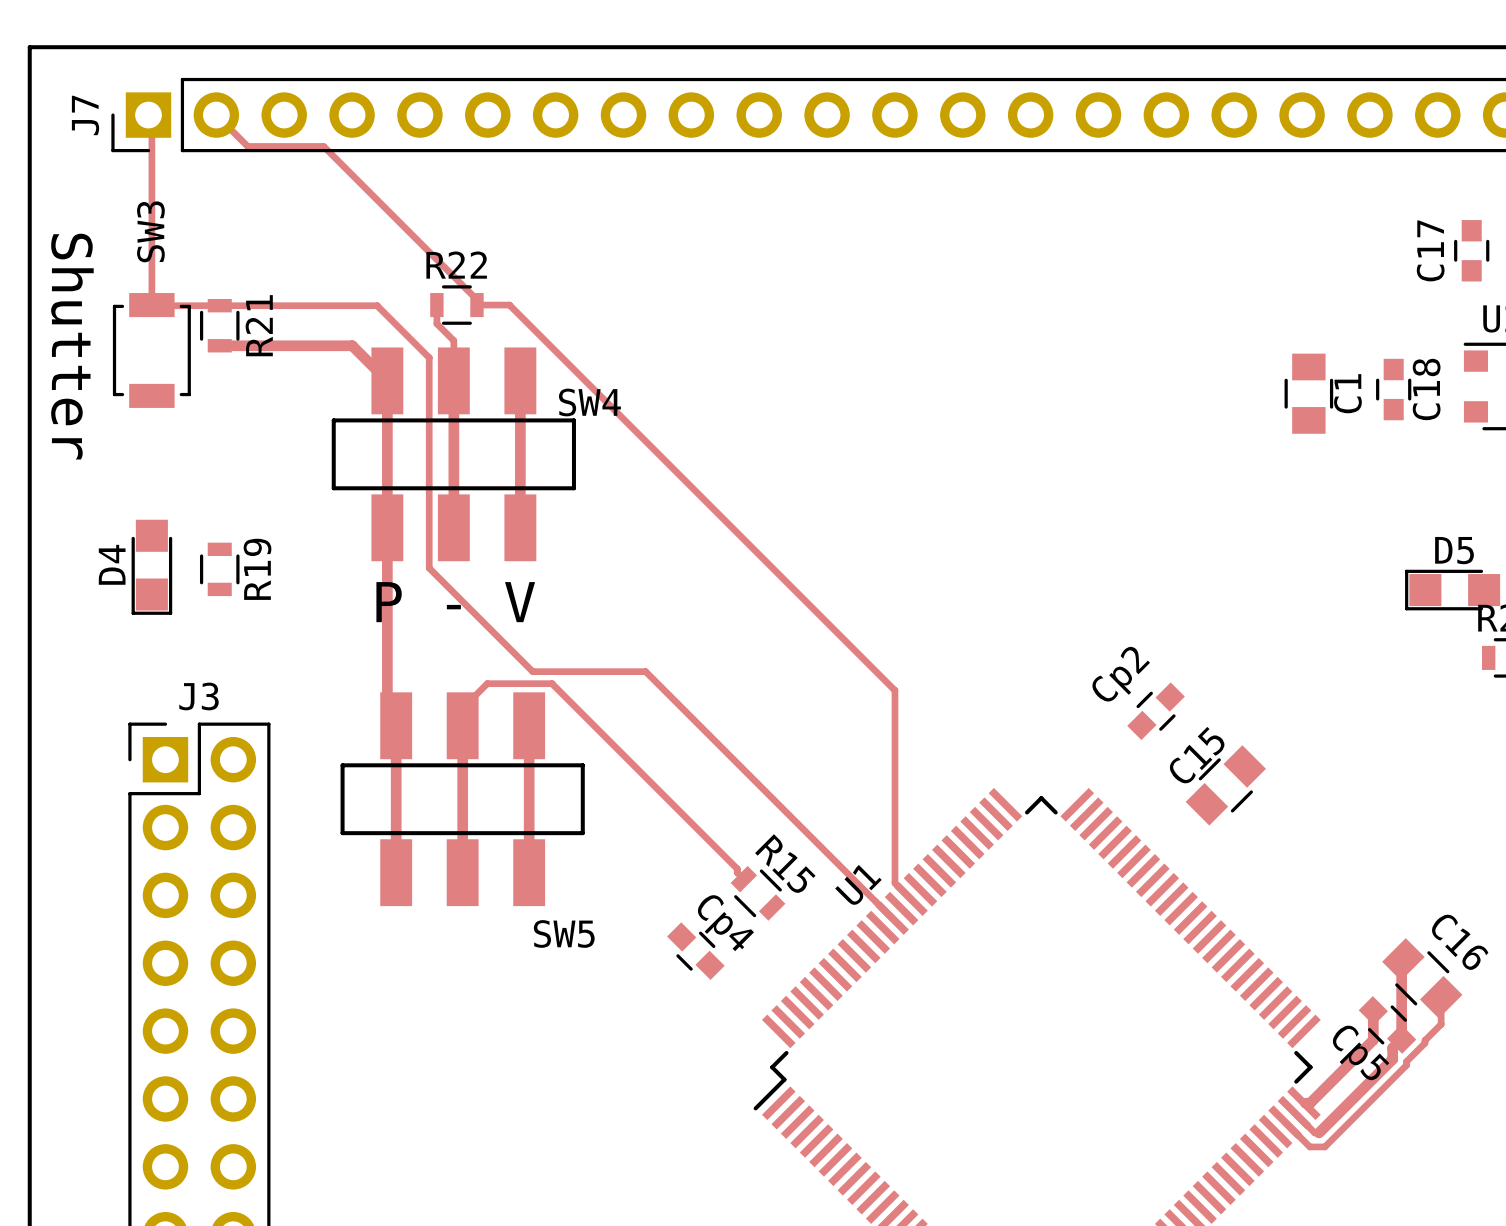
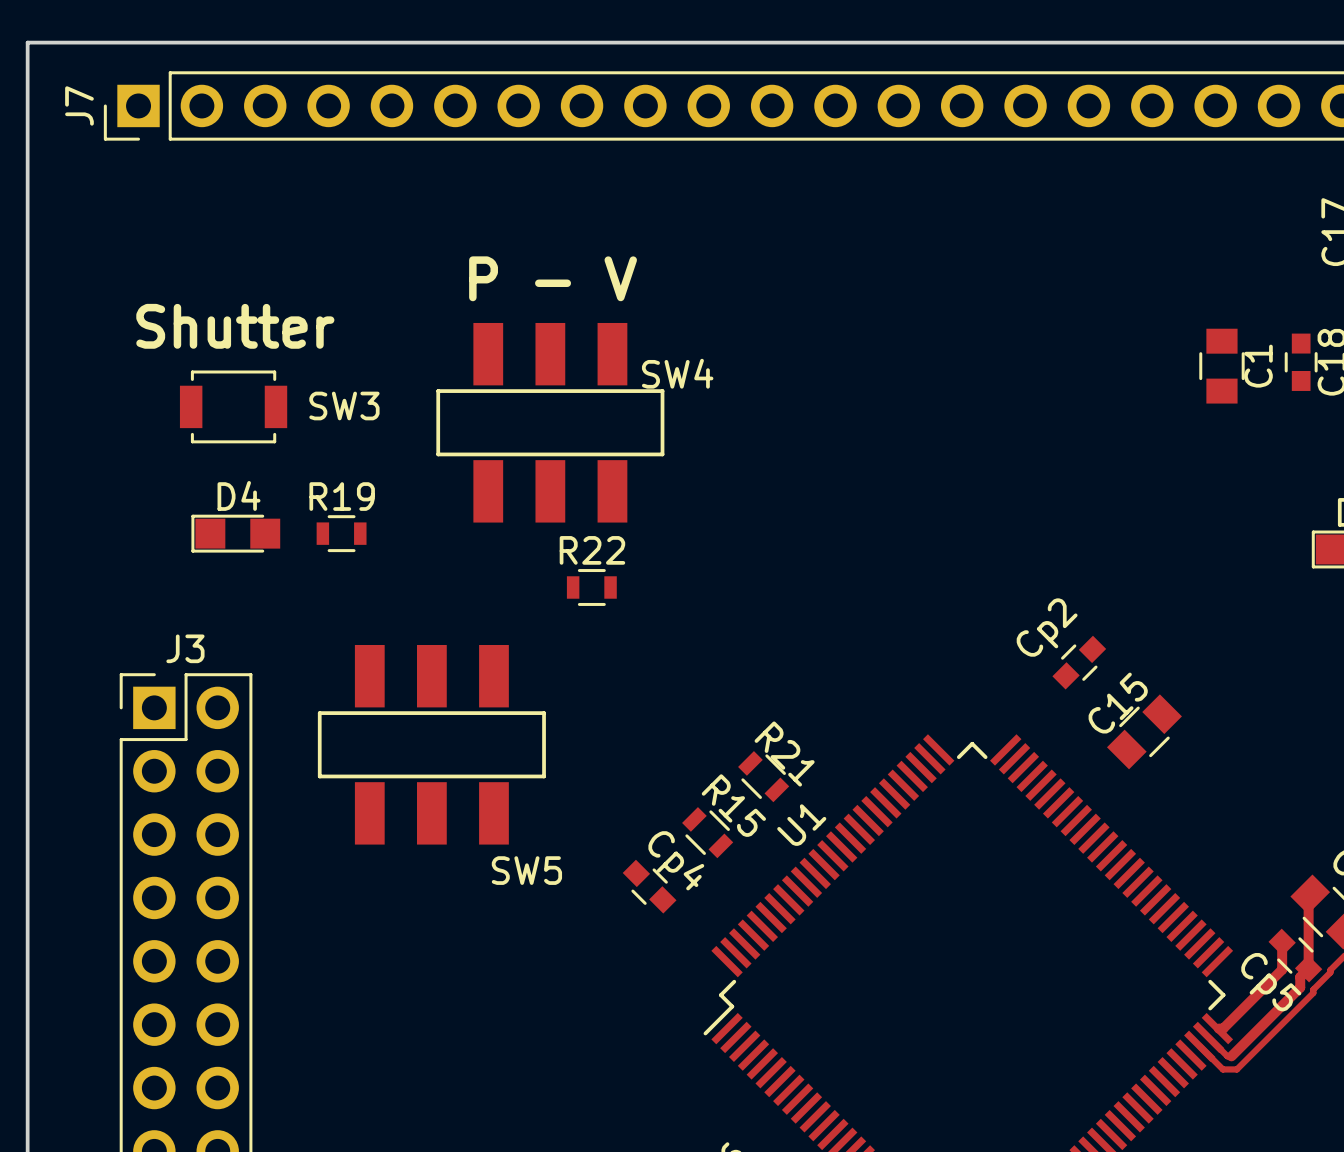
top track: (148, 115) (151, 118) (151, 305) (377, 305) (429, 357) (429, 568) (532, 671) (645, 671) (892, 918) -> none
top track: (216, 115) (247, 146) (323, 146) (476, 299) (476, 305) (509, 305) (894, 690) (894, 883) (911, 899) -> none
top track: (436, 305) (436, 323) (453, 340) (453, 527) -> none
R22 position: (456, 305) -> (591, 587)
R21 rotation: 0° (219, 325) -> 45° counterclockwise (763, 776)
R21 position: (219, 325) -> (763, 776)
top track: (219, 345) (352, 345) (387, 380) (387, 716) (396, 725) (396, 872) -> none
text rotation: 0° (72, 346) -> 90° counterclockwise (235, 326)
SW3 rotation: 0° (151, 350) -> 90° clockwise (233, 406)
SW3 position: (151, 350) -> (233, 406)
top track: (520, 380) (520, 527) -> none
SW4 position: (453, 454) -> (550, 422)
D4 rotation: 0° (151, 567) -> 90° clockwise (235, 533)
D4 position: (151, 567) -> (235, 533)
R19 rotation: 0° (219, 569) -> 90° clockwise (341, 533)
R19 position: (219, 569) -> (341, 533)
R19 name position: R19 (257, 569) -> R19 (342, 496)
text position: P - V (455, 602) -> P - V (553, 278)
top track: (529, 725) (529, 872) -> none
top track: (462, 872) (462, 708) (487, 683) (552, 683) (737, 868) (737, 872) (743, 879) -> none

